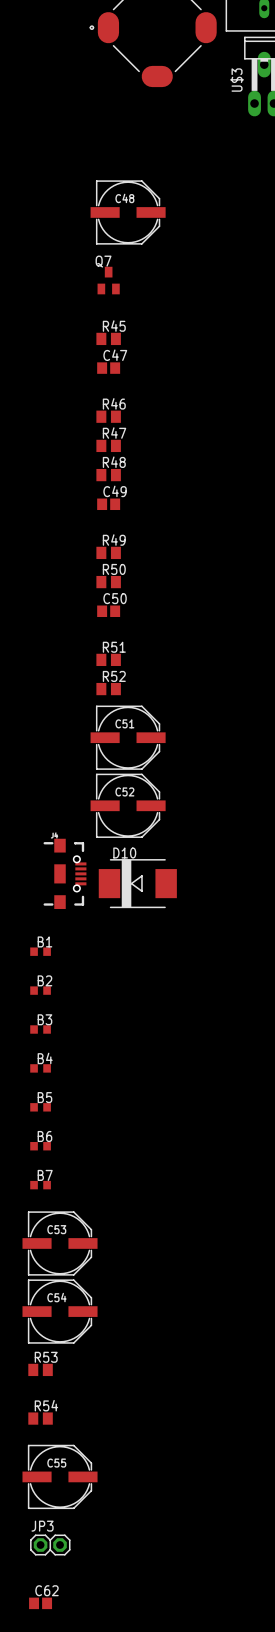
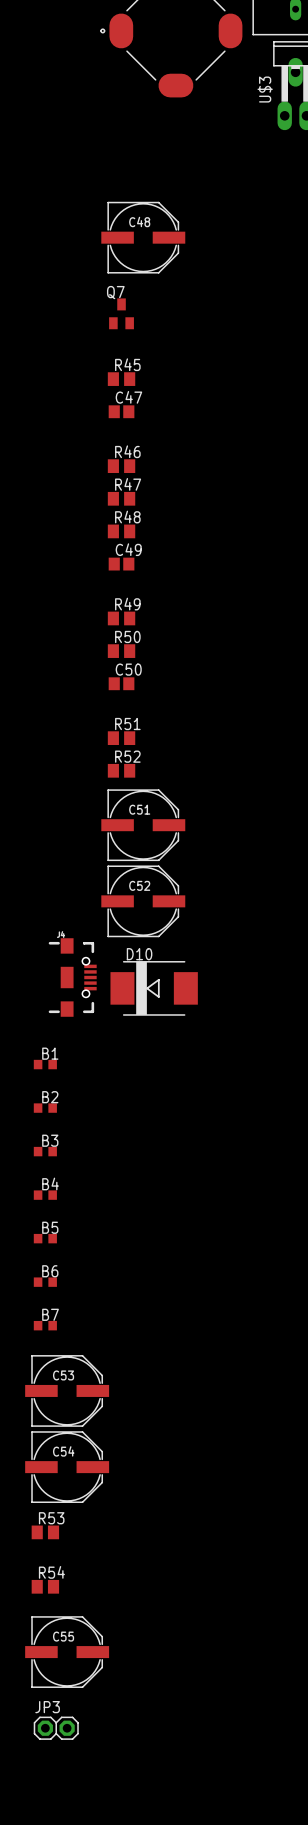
C62: (40, 1603) -> none

